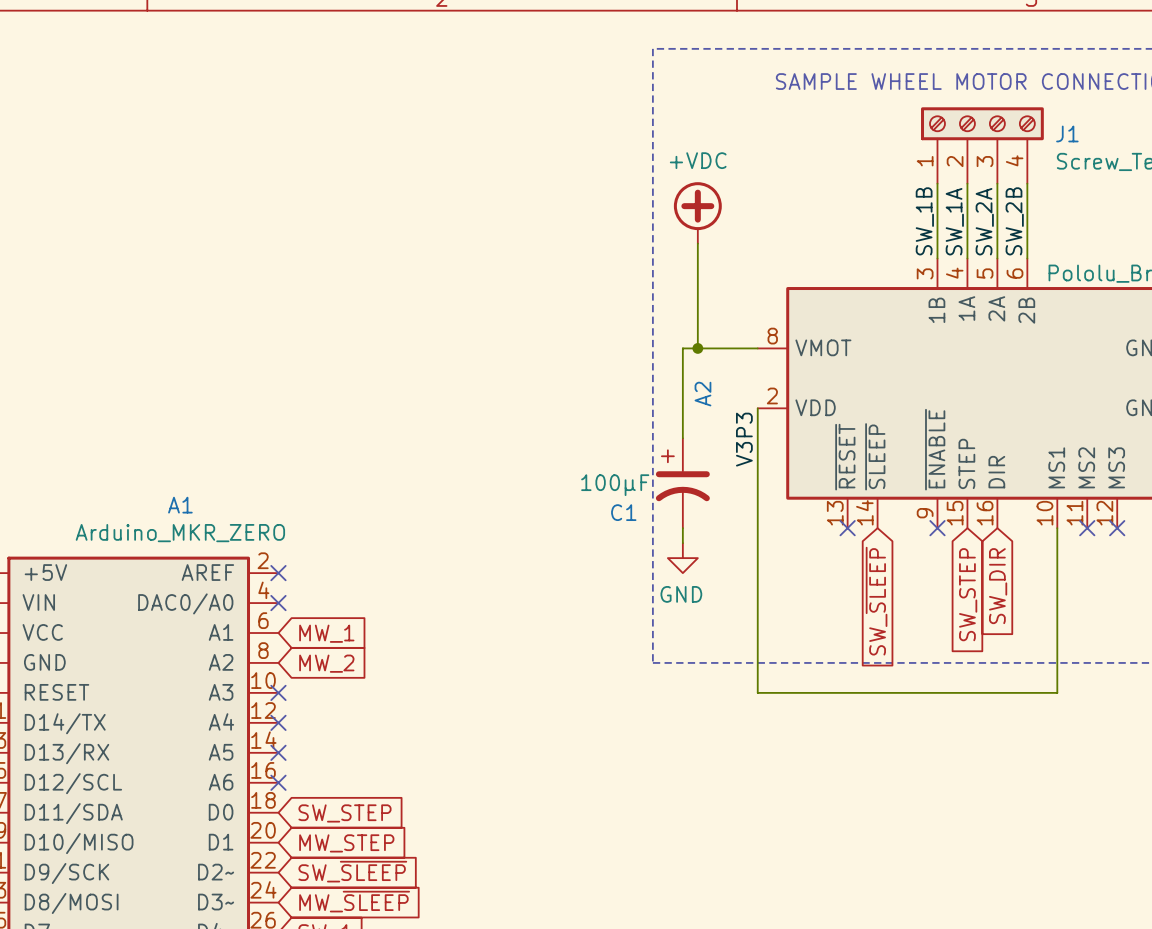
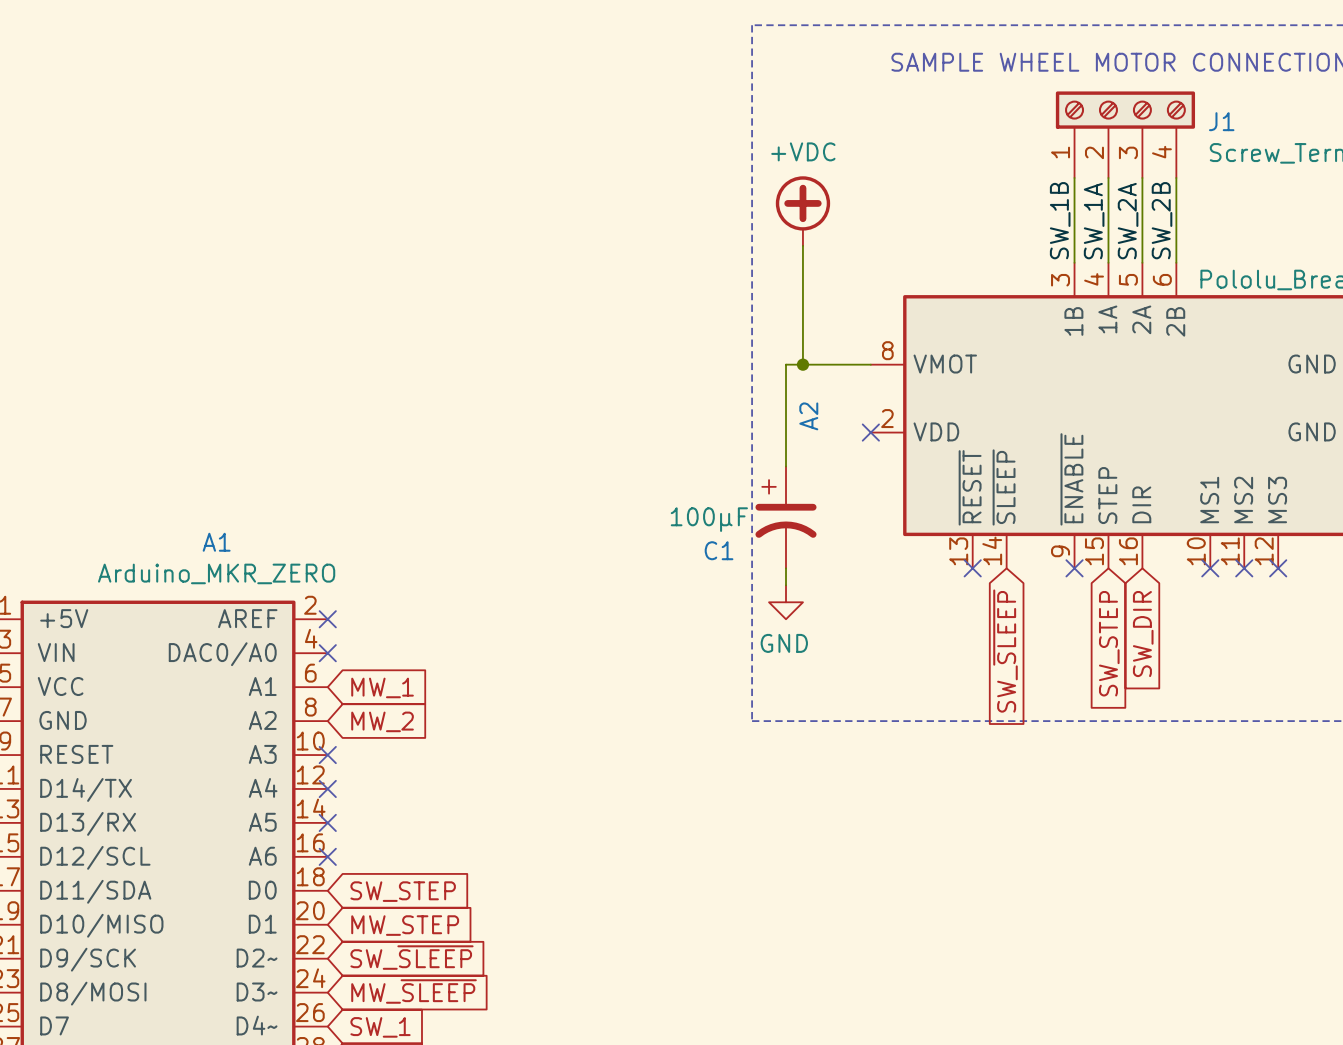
wire: (757, 408) (757, 692) (1057, 692) (1057, 528) -> none
no-connect mark: none -> (870, 432)
label: V3P3 (744, 439) -> none
no-connect mark: none -> (1210, 568)

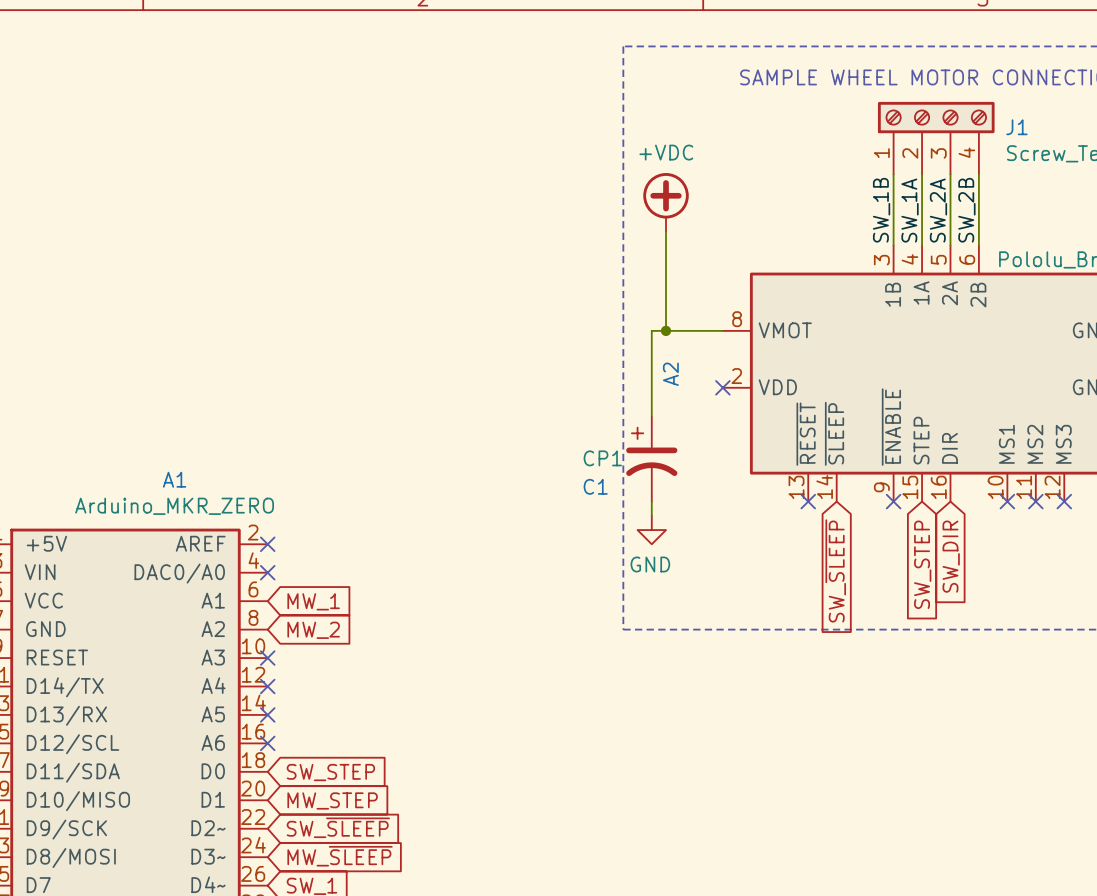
C1 value: 100μF (709, 519) -> CP1 (602, 458)

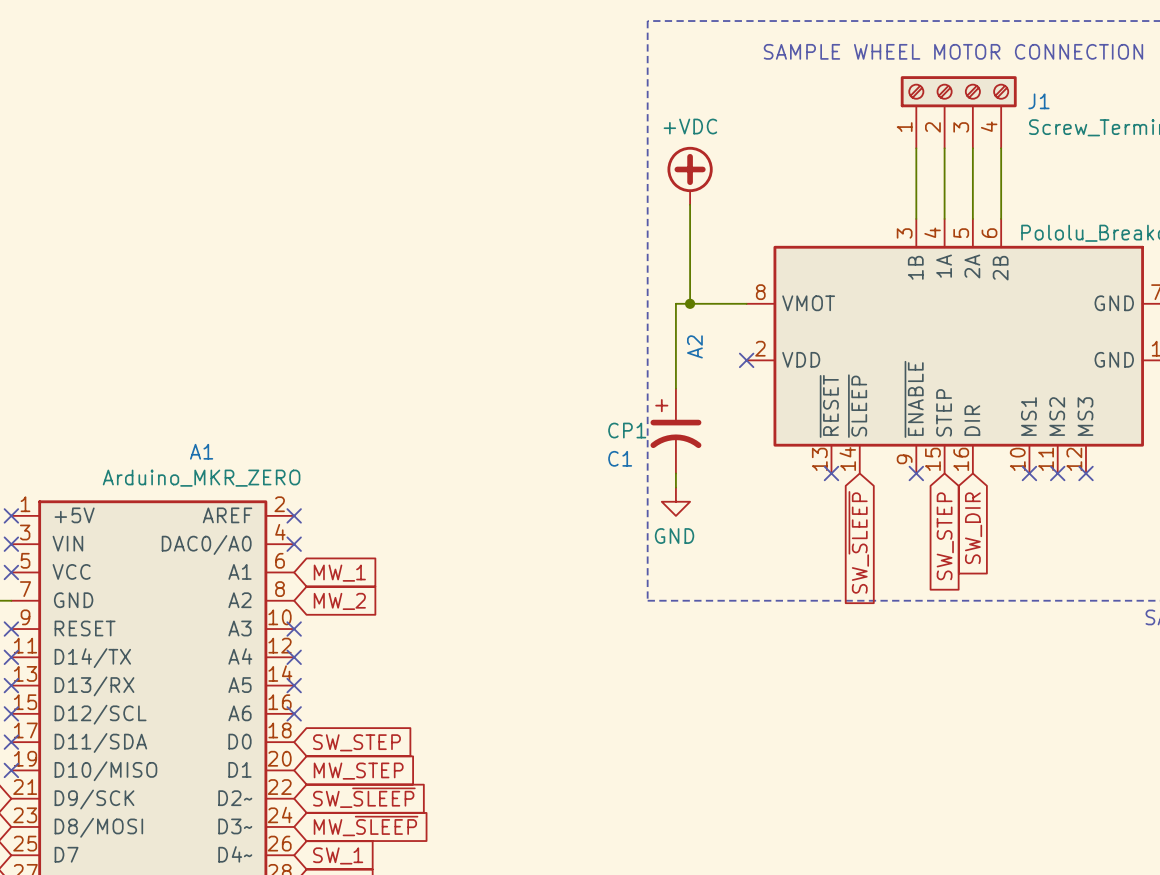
label: SW_1B (881, 210) -> none
label: SW_1A (910, 210) -> none
label: SW_2A (938, 210) -> none
label: SW_2B (966, 210) -> none

